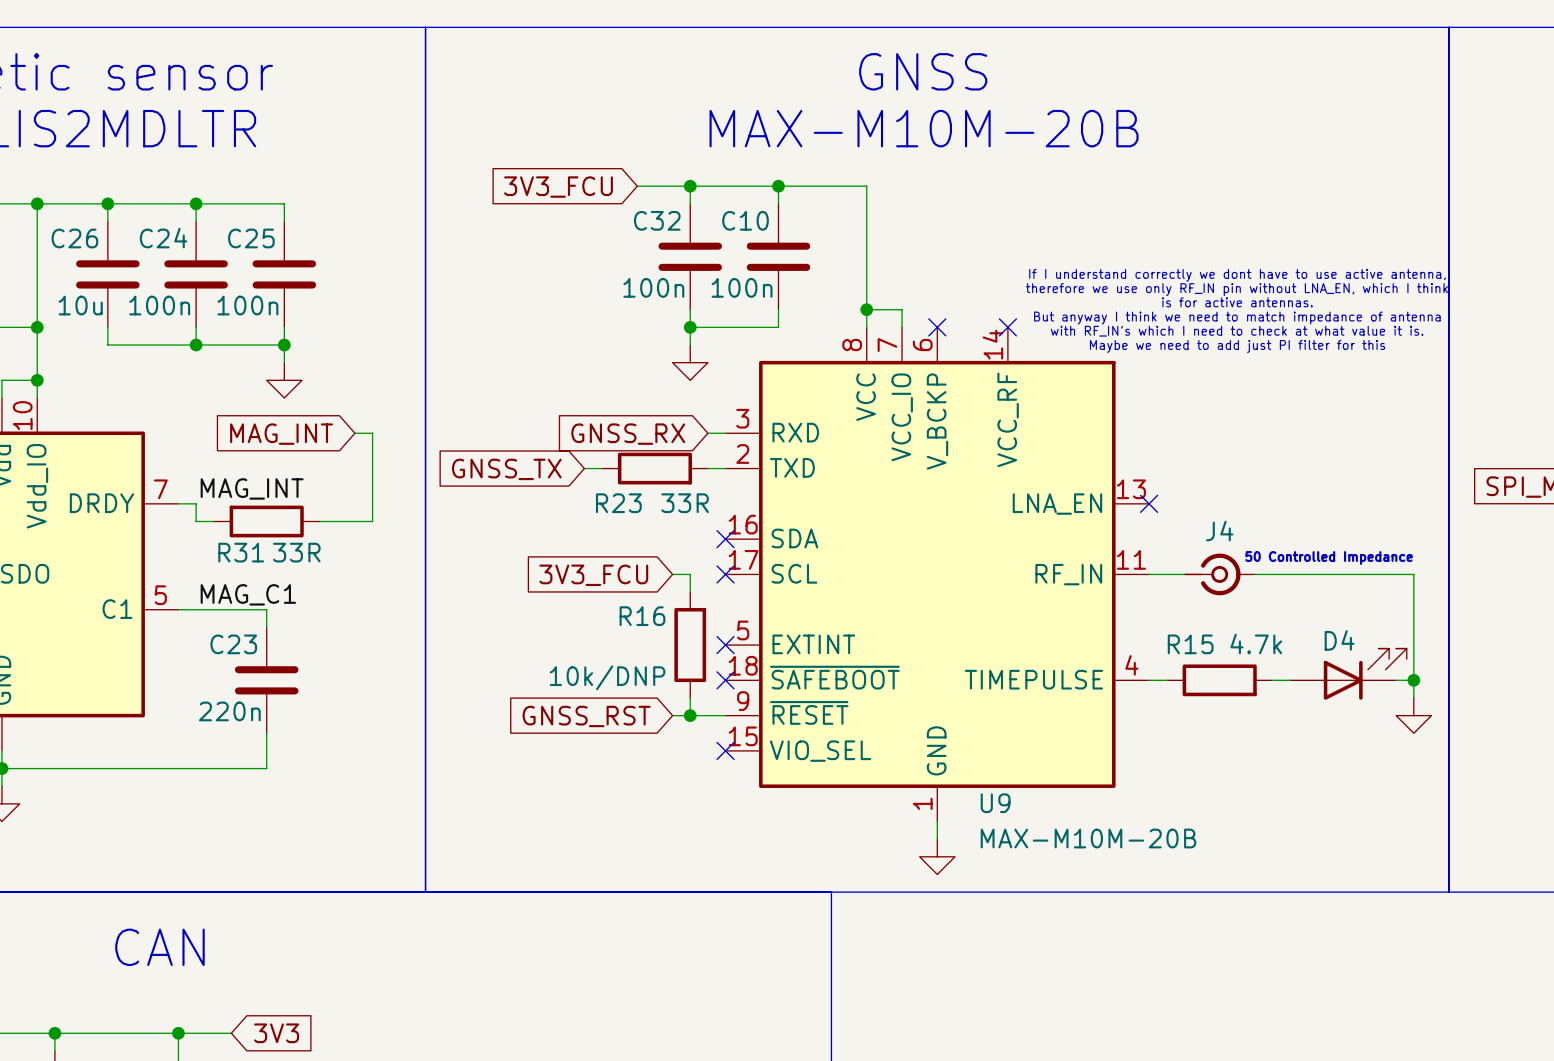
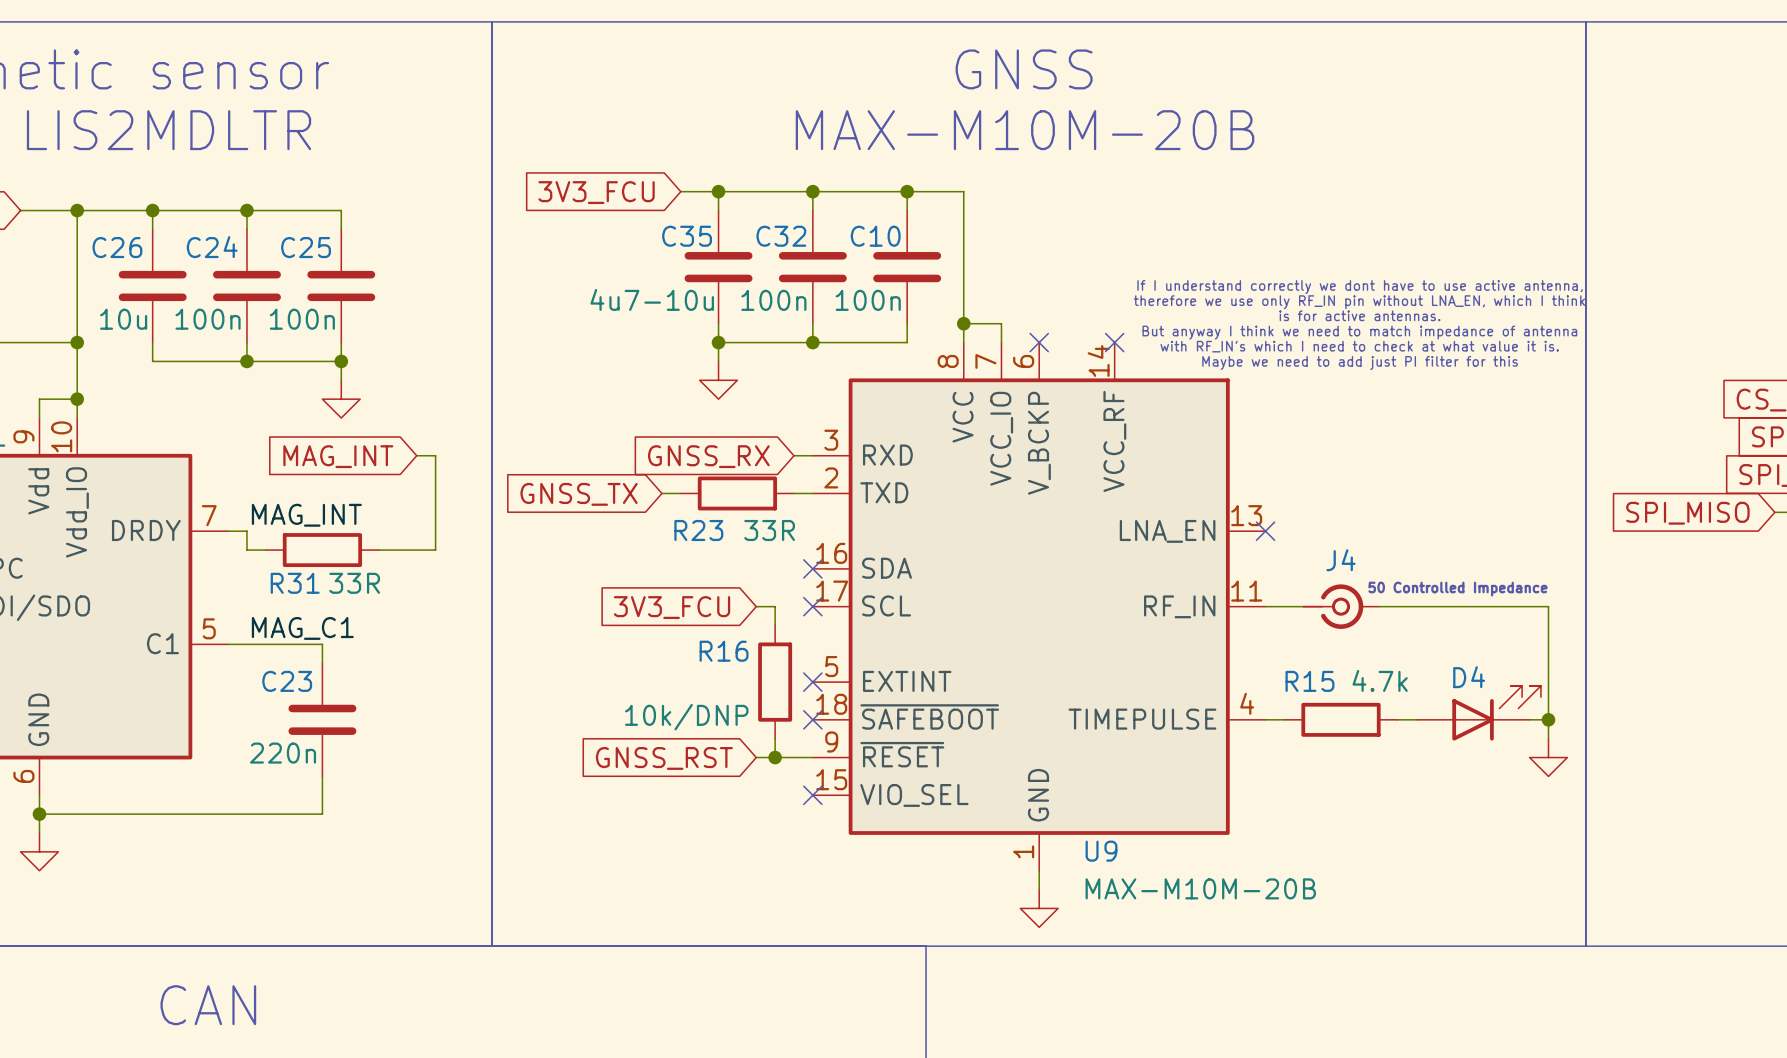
wire: none -> (680, 191) (718, 191) (718, 210)
junction: none -> (718, 191)
wire: (690, 186) (690, 203) -> (907, 191) (907, 210)
junction: (690, 186) -> none
junction: none -> (812, 191)
wire: (778, 186) (778, 203) -> (812, 191) (812, 210)
junction: (778, 186) -> none
junction: none -> (907, 191)
global label position: 3V3_FCU (558, 187) -> 3V3_FCU (596, 192)
C32 name position: C32 (657, 220) -> C32 (781, 236)
C10 name position: C10 (745, 220) -> C10 (875, 236)
C35: none -> 4u7-10u (718, 267)
C32 position: (690, 256) -> (812, 267)
C10 position: (778, 256) -> (907, 267)
wire: (690, 309) (690, 345) -> (718, 323) (718, 361)
wire: none -> (812, 323) (812, 342)
wire: (778, 309) (778, 327) -> (907, 323) (907, 342) (869, 342)
wire: none -> (718, 342) (775, 342)
junction: none -> (718, 342)
junction: (690, 327) -> none
junction: none -> (812, 342)
power symbol position: (690, 362) -> (718, 380)

